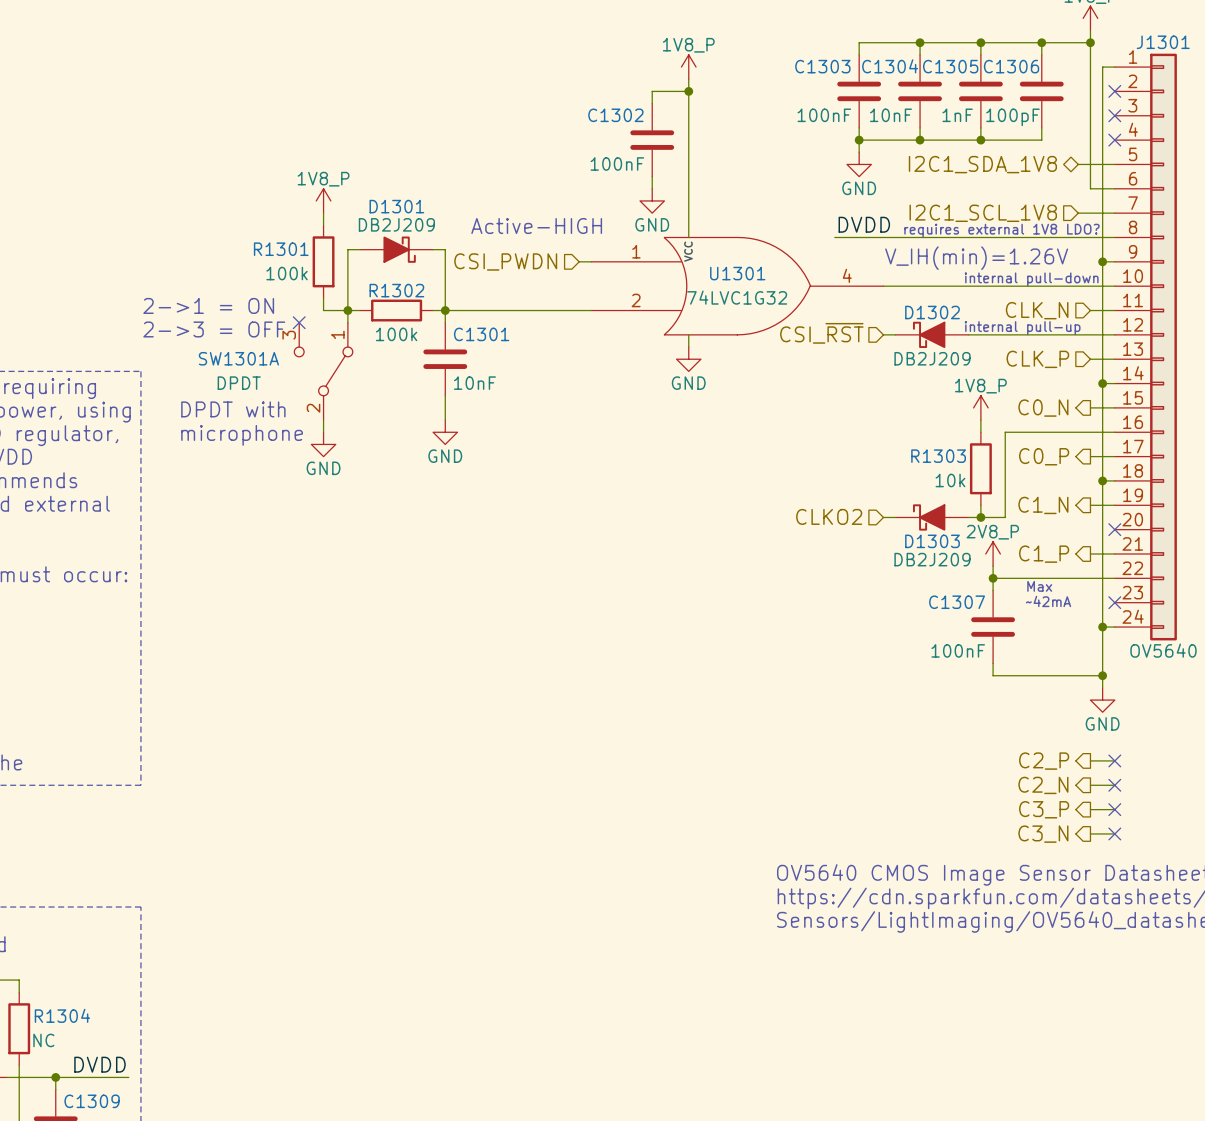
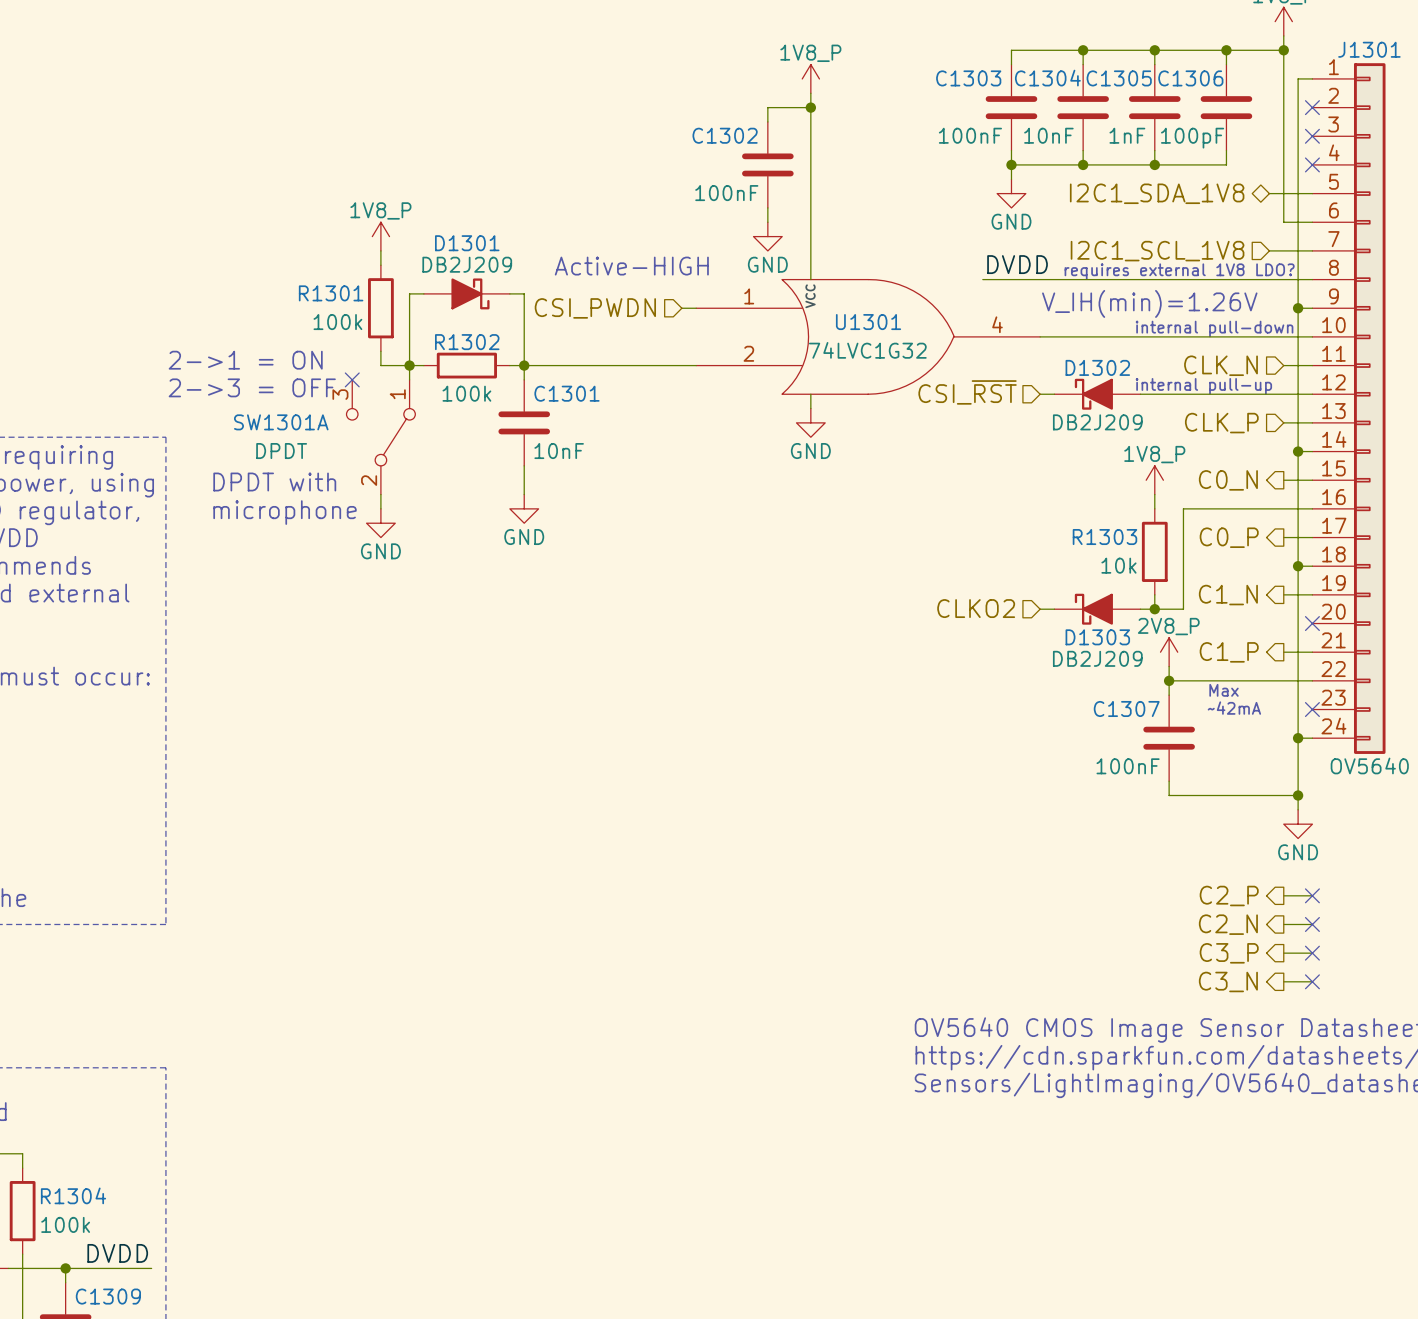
R1304 value: NC (43, 1040) -> 100k (65, 1224)

